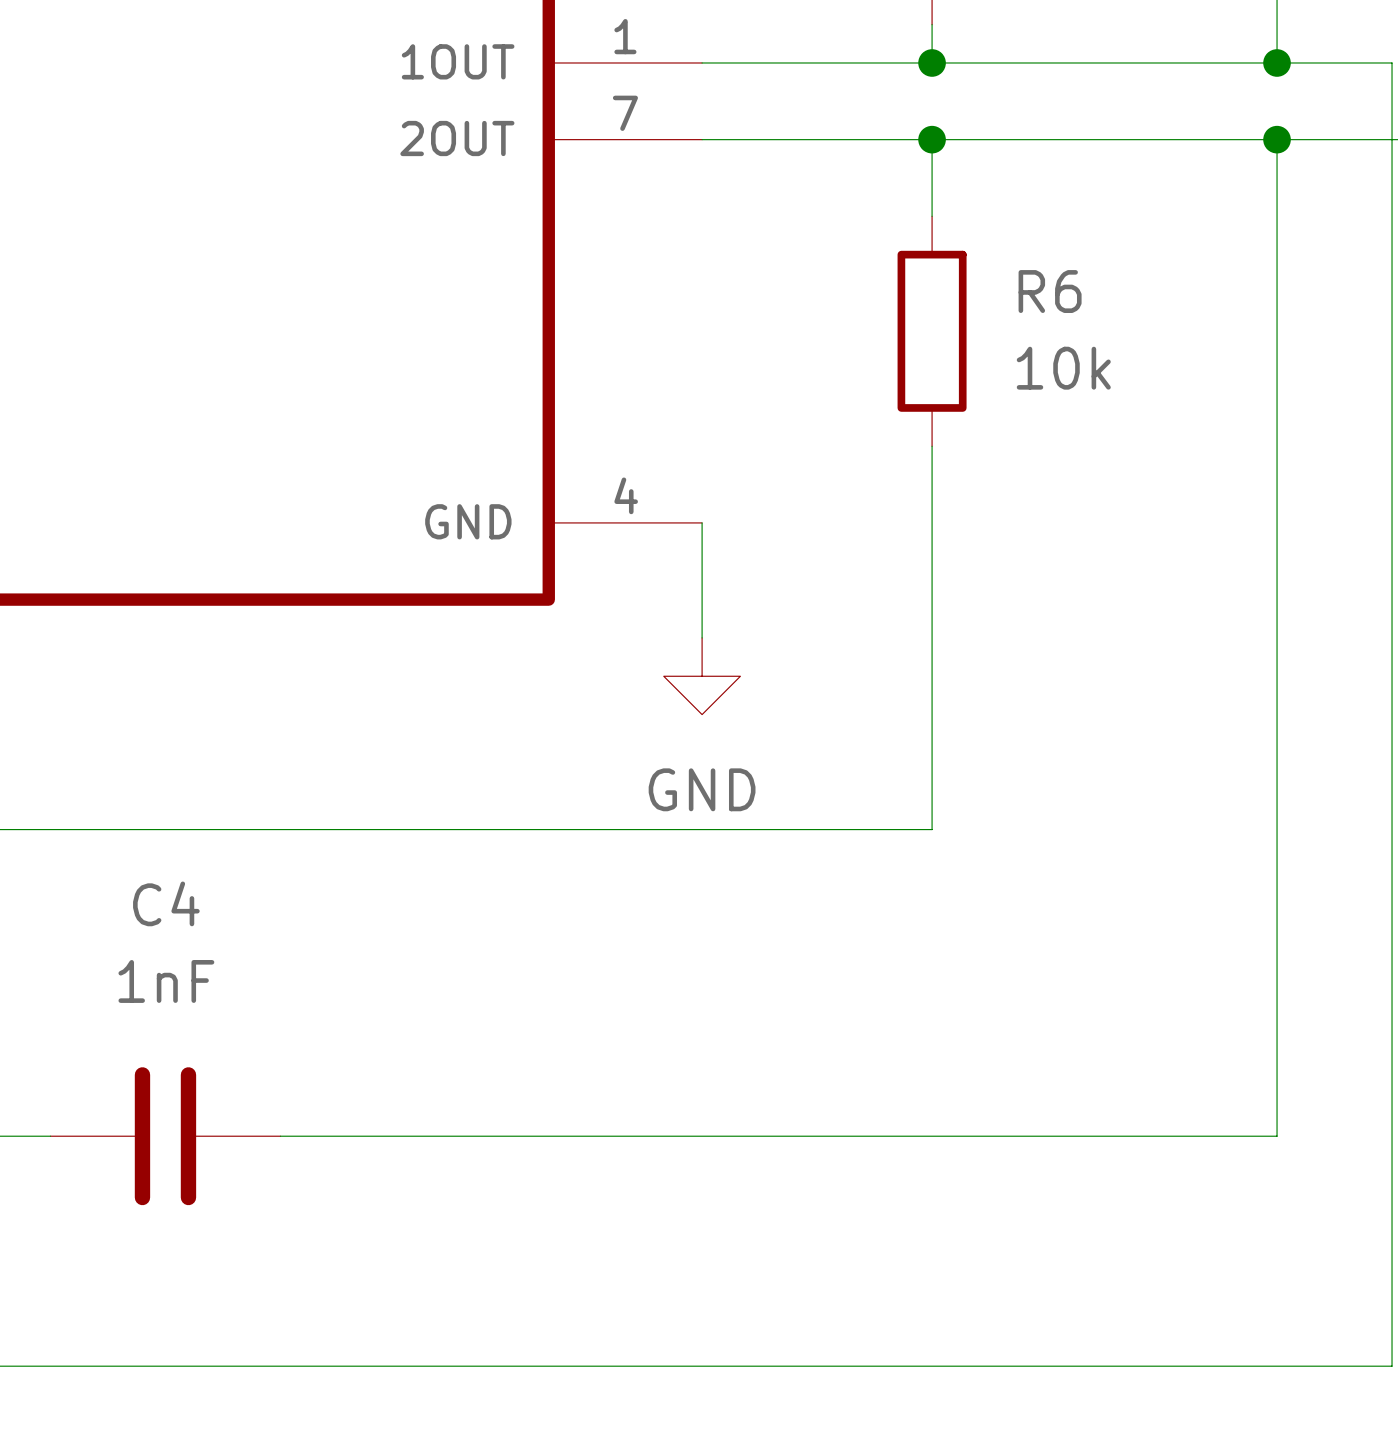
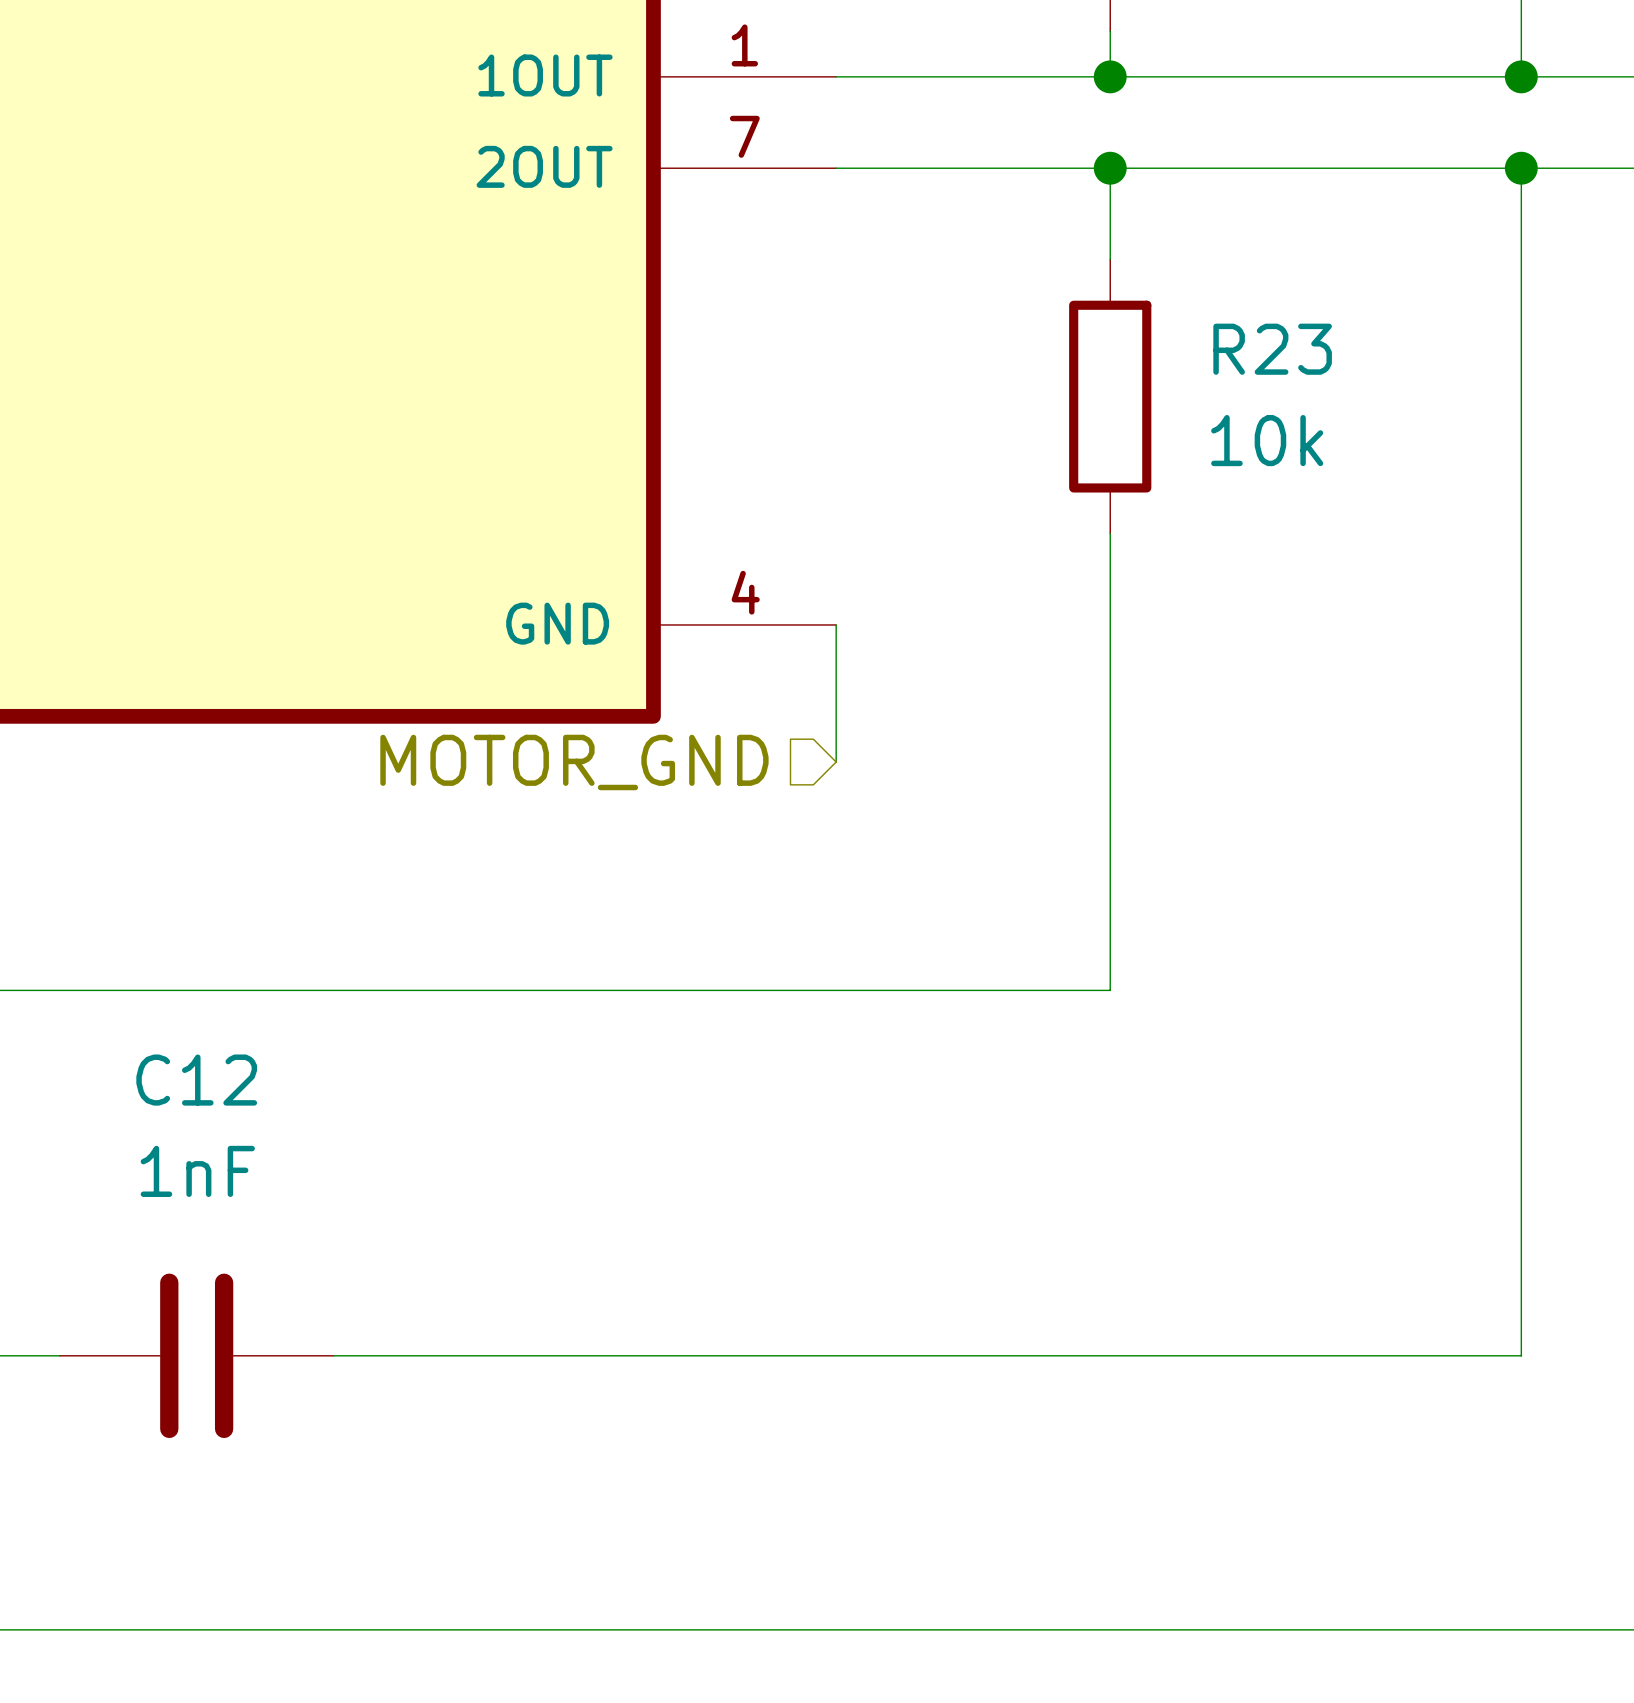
R6 name: R6 (1050, 291) -> R23 (1272, 349)
hierarchical label: none -> MOTOR_GND (574, 762)
power symbol: GND (702, 676) -> none
C4 name: C4 (166, 903) -> C12 (196, 1080)

